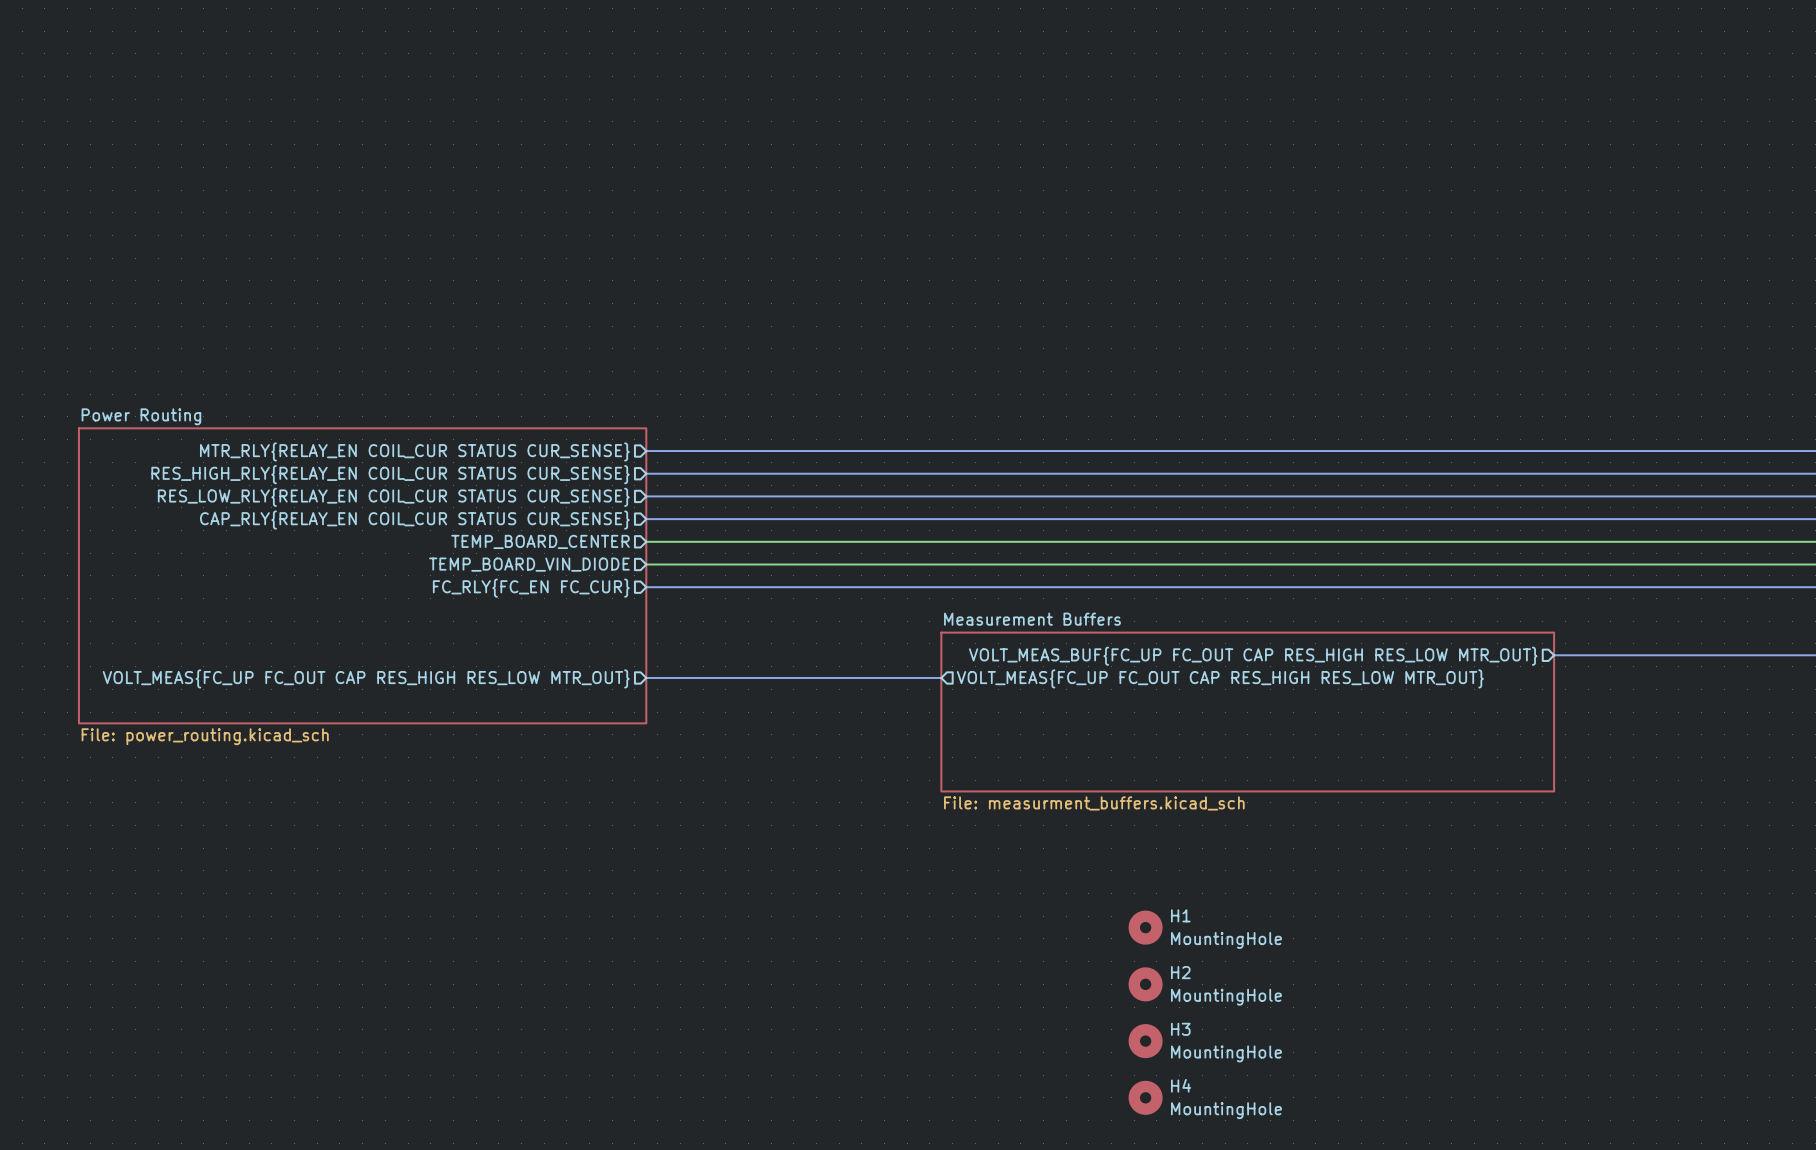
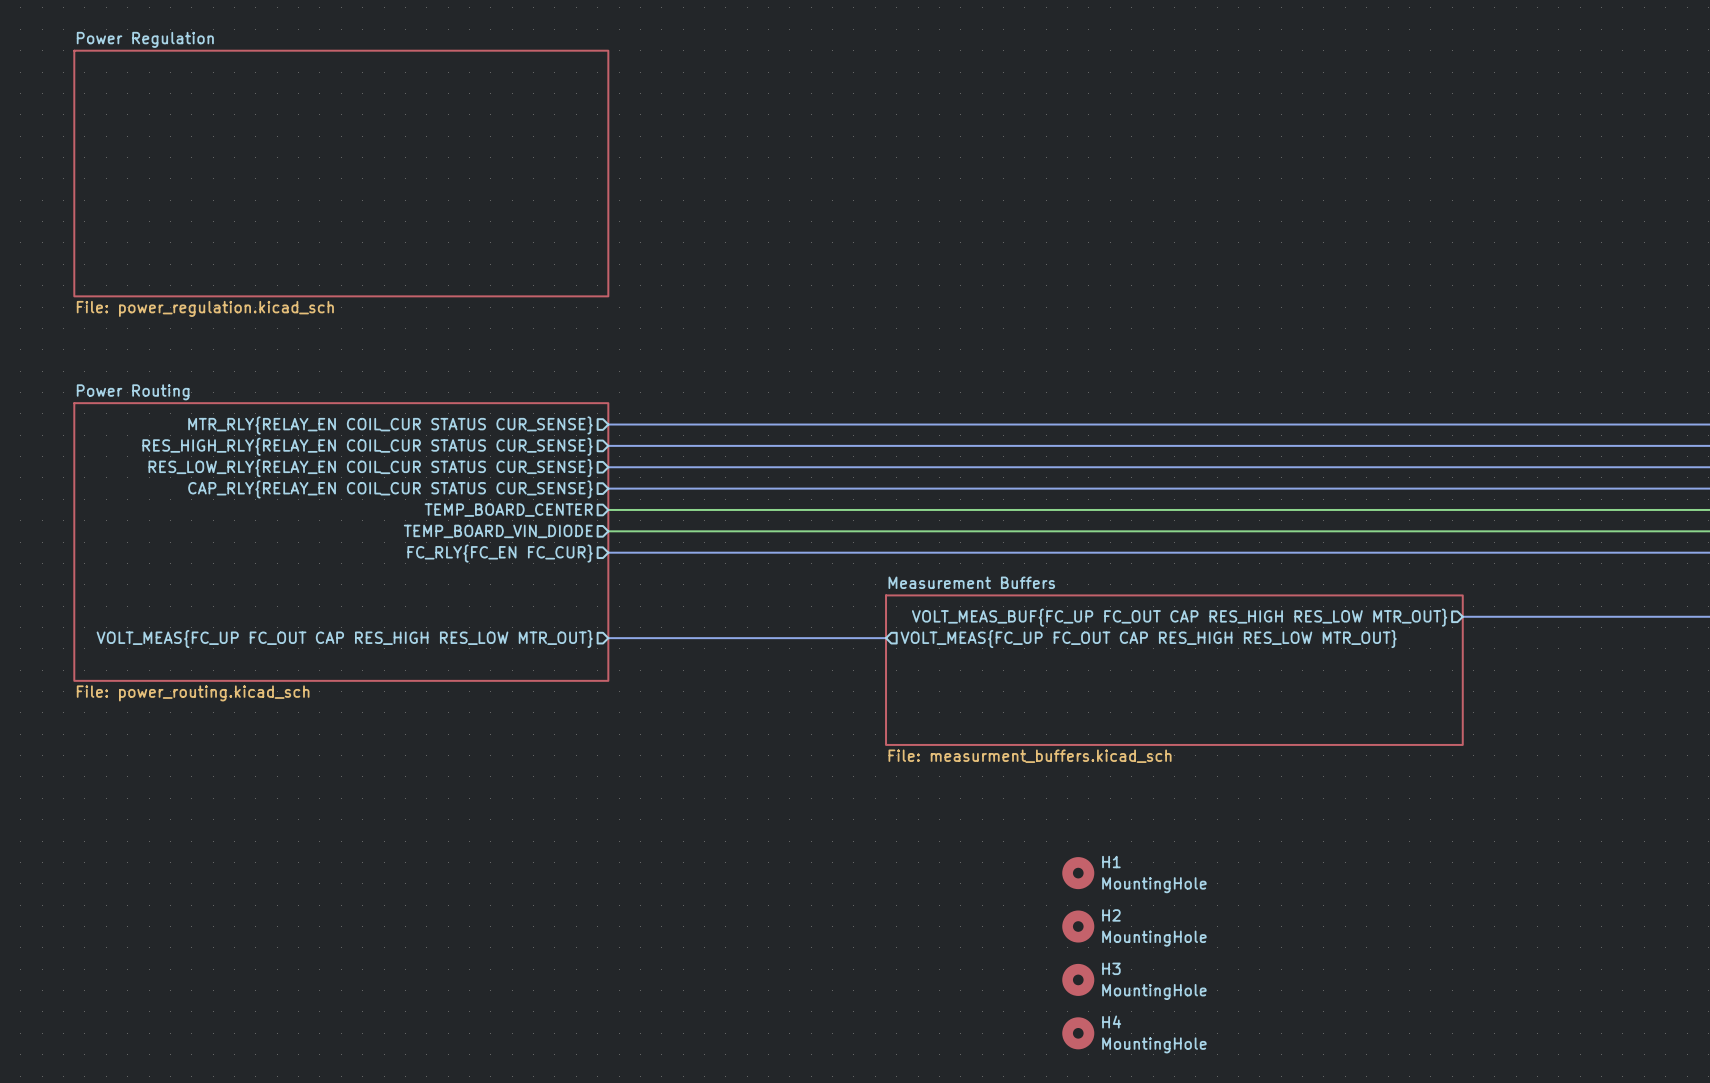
sheet Power Regulation: none -> File: power_regulation.kicad_sch (341, 173)

